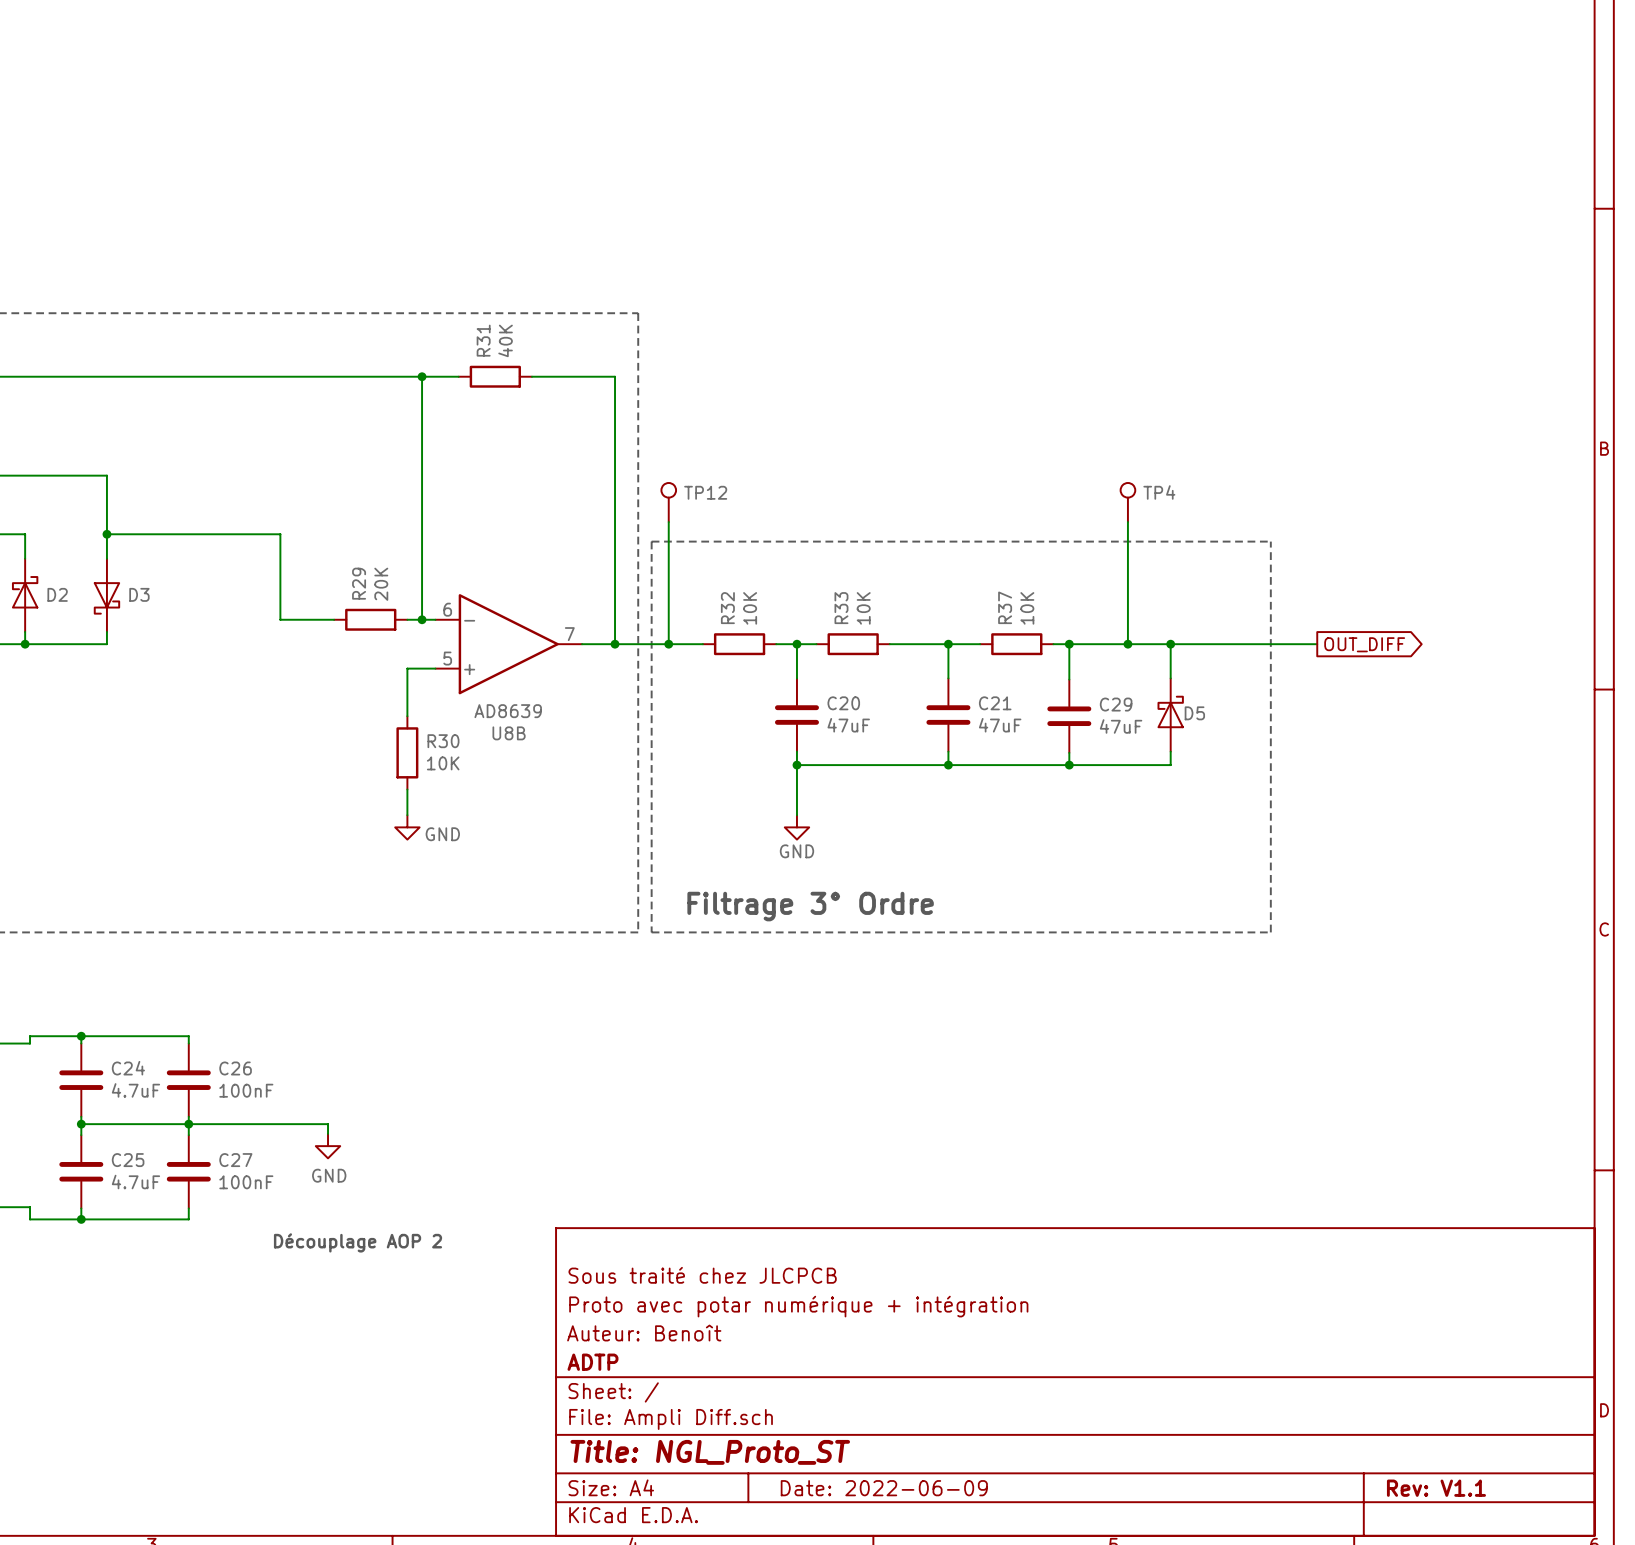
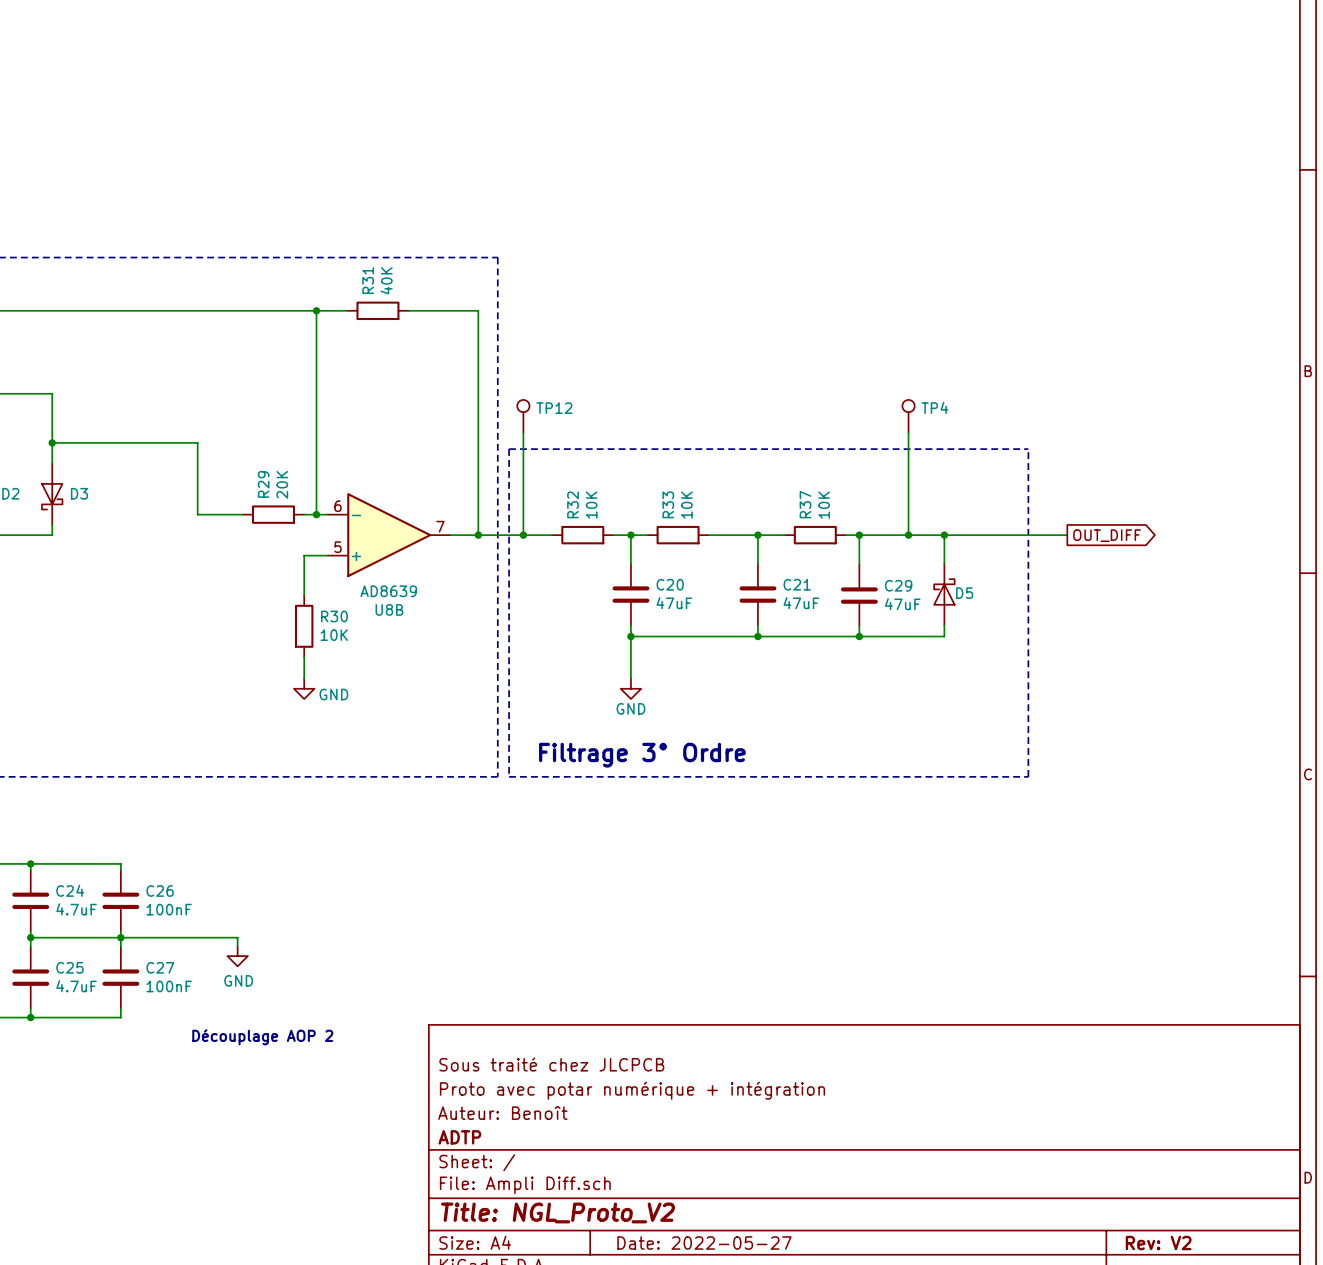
title block: Title: NGL_Proto_ST (710, 1452) -> Title: NGL_Proto_V2 (558, 1212)
title block: Date: 2022-06-09 (884, 1488) -> Date: 2022-05-27 (704, 1243)
title block: Rev: V1.1 (1436, 1488) -> Rev: V2 (1158, 1243)

